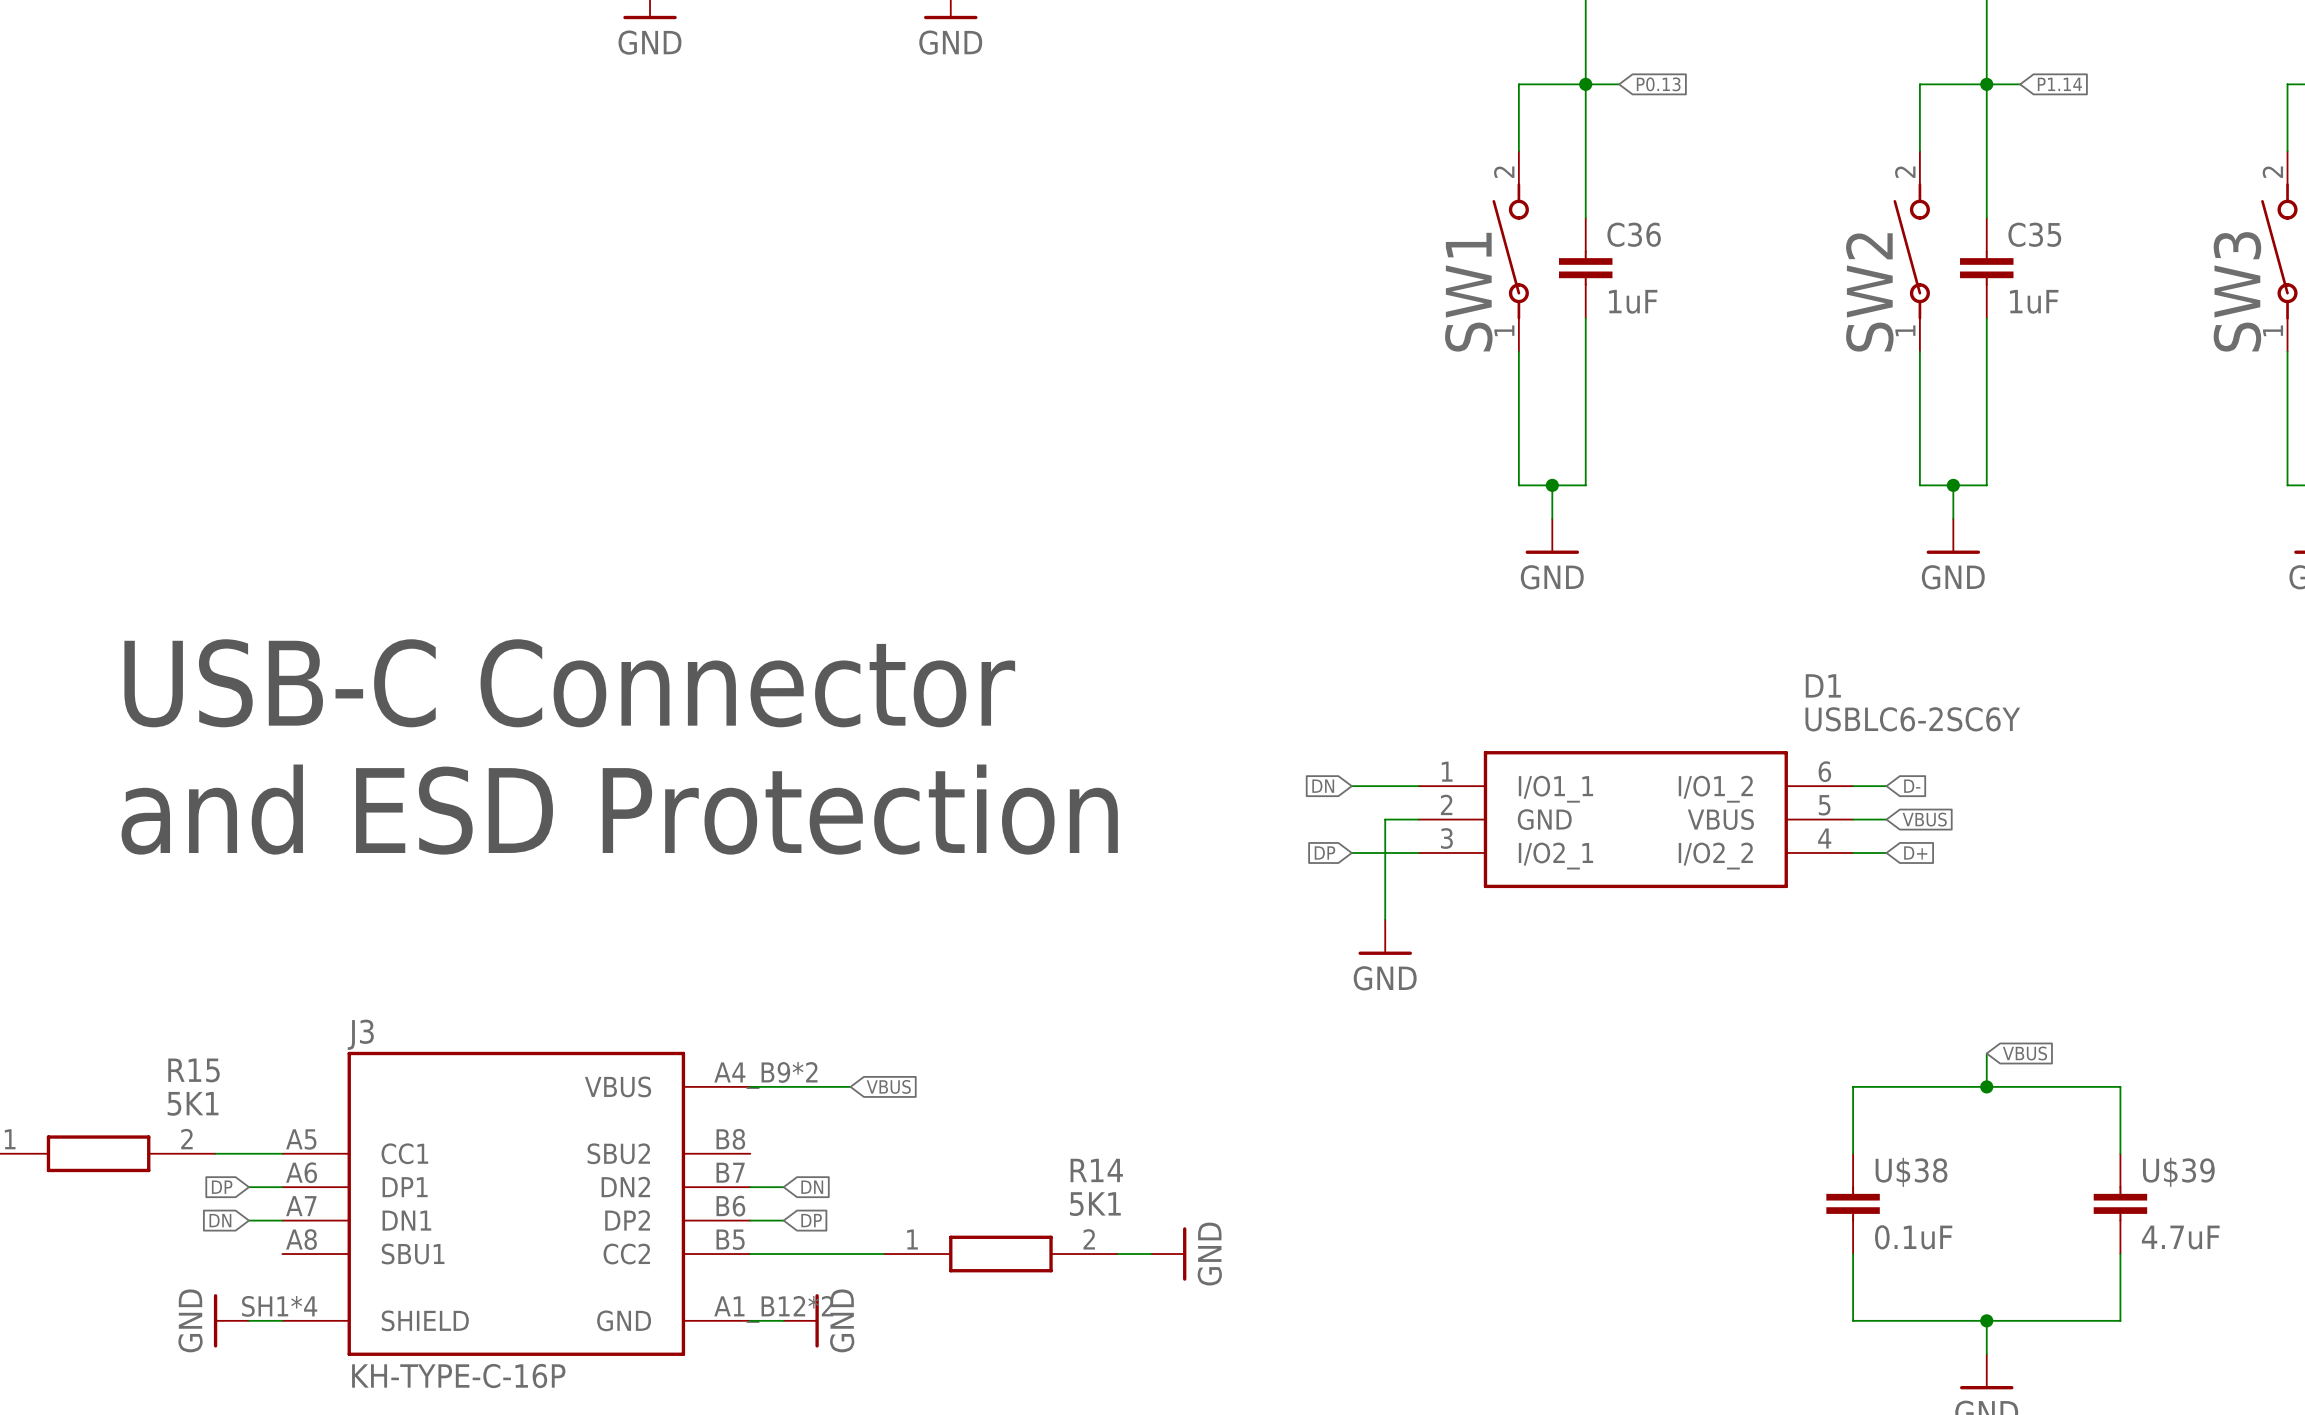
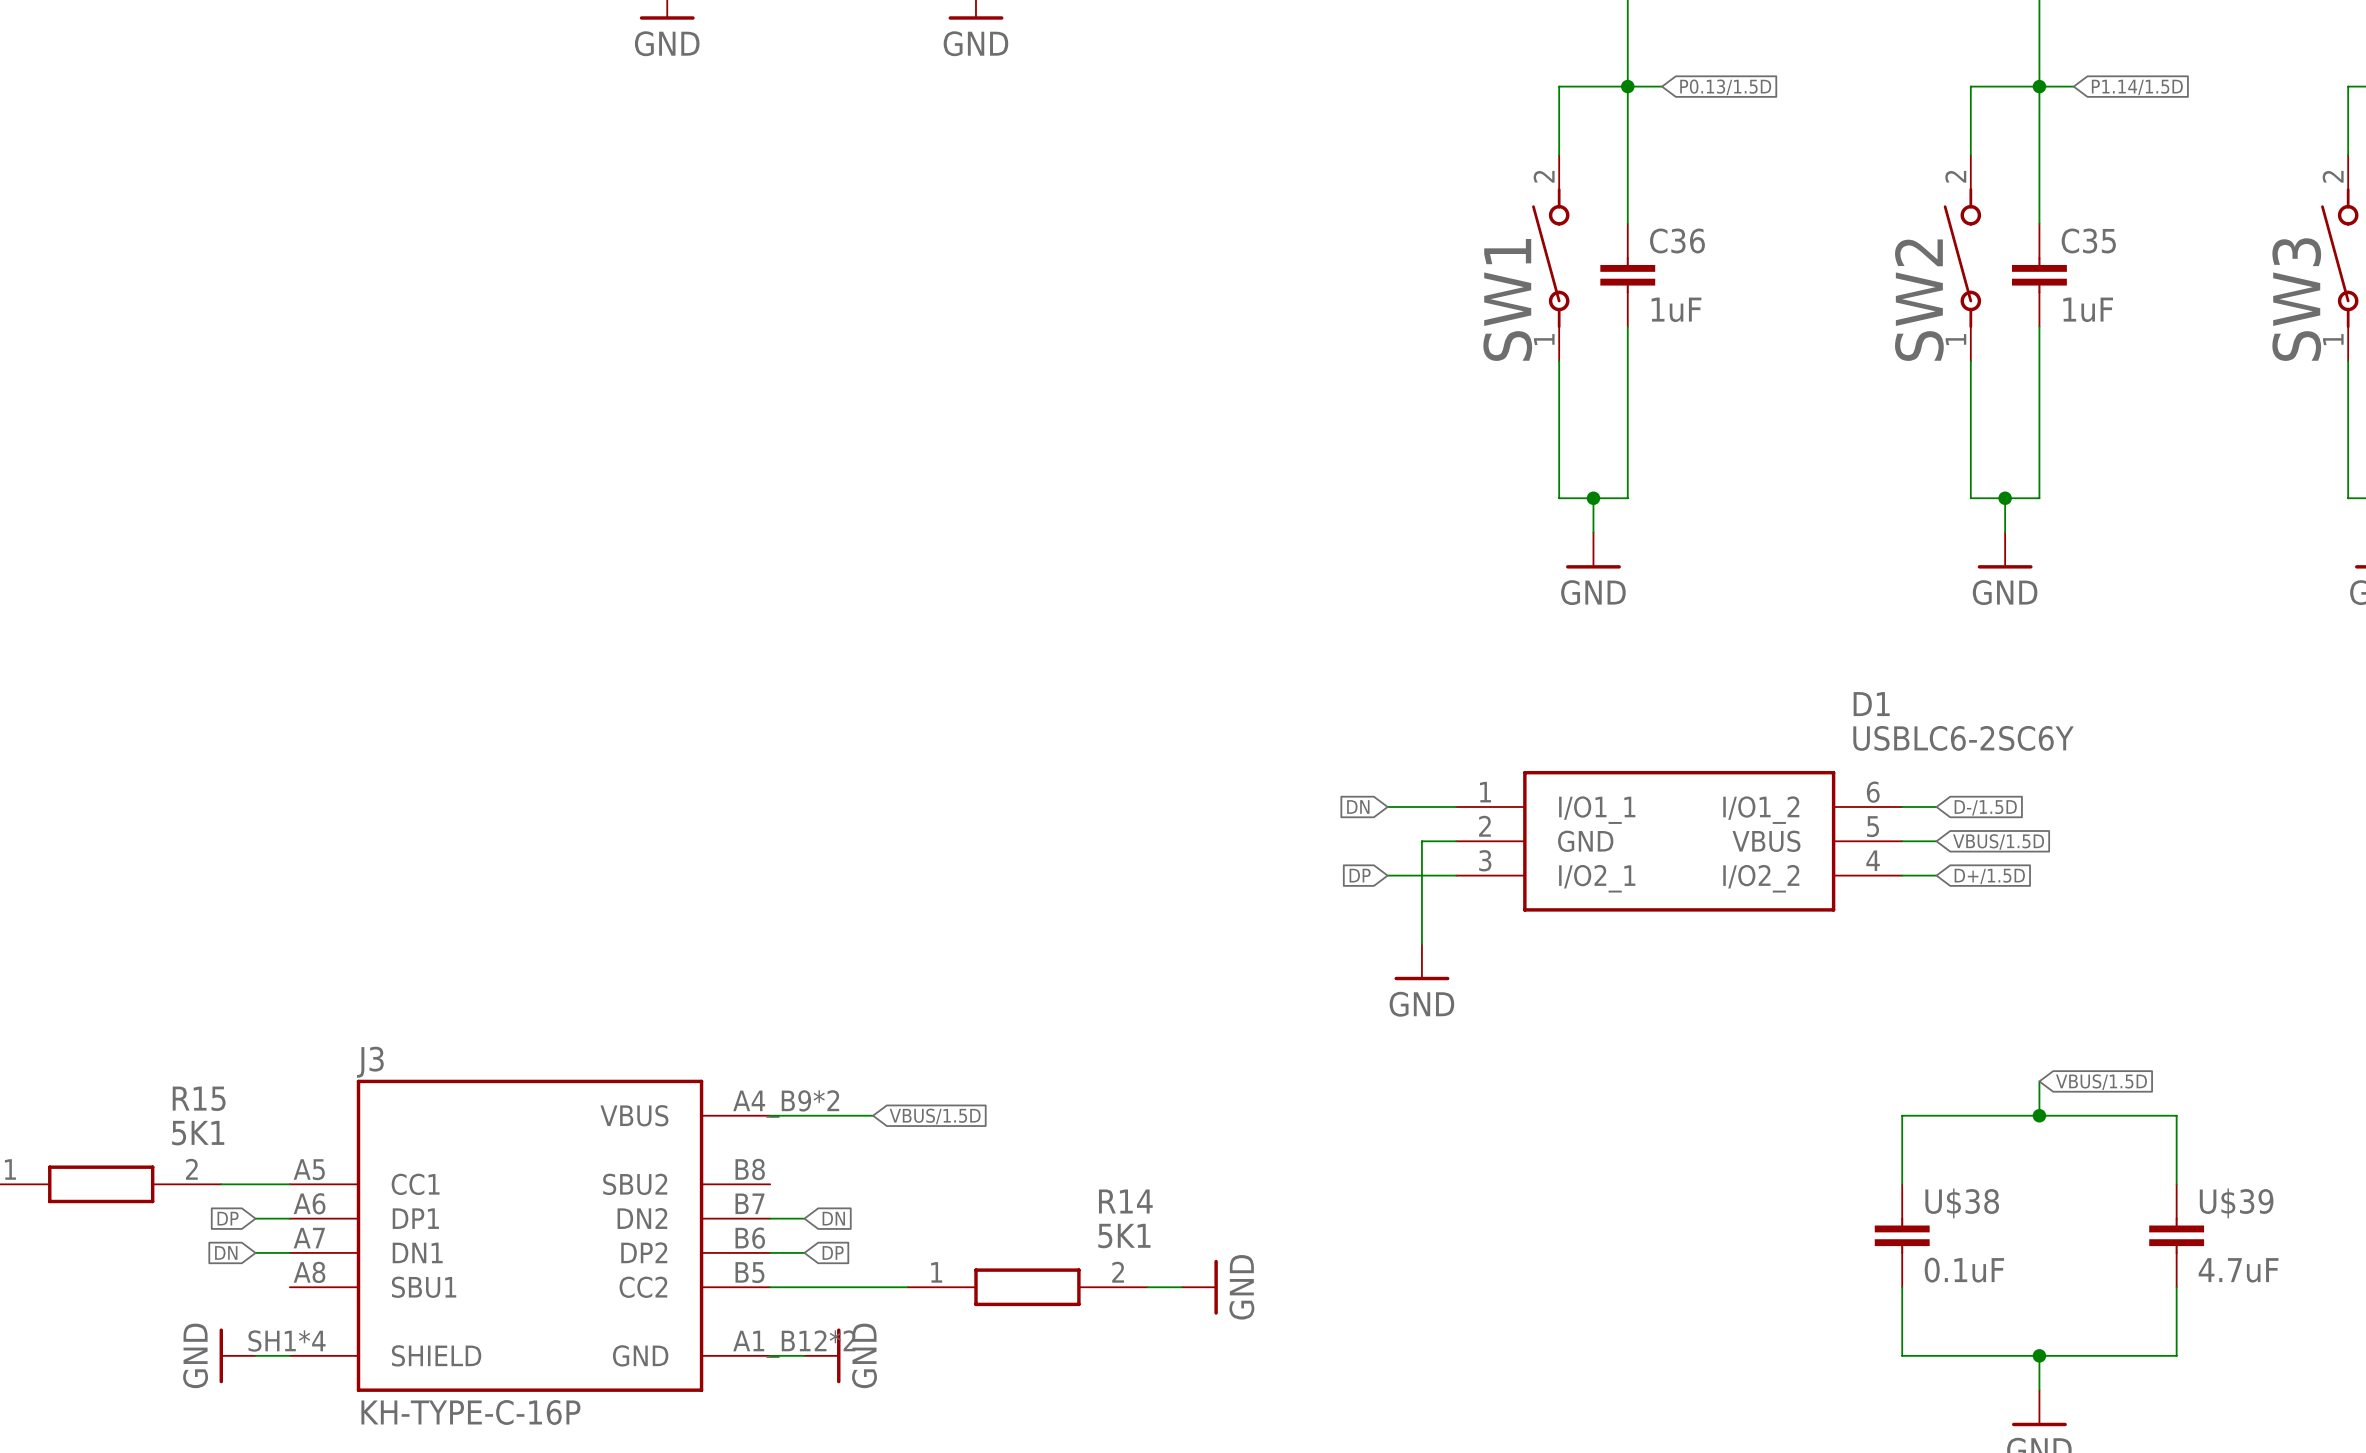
global label: P0.13 (1658, 84) -> P0.13/1.5D (1725, 87)
global label: P1.14 (2059, 84) -> P1.14/1.5D (2137, 87)
text: USB-C Connector (569, 683) -> none
global label: D- (1912, 786) -> D-/1.5D (1985, 807)
text: and ESD Protection (619, 809) -> none
global label: VBUS (1924, 819) -> VBUS/1.5D (1998, 842)
global label: D+ (1915, 852) -> D+/1.5D (1989, 876)
global label: VBUS (2024, 1053) -> VBUS/1.5D (2101, 1082)
global label: VBUS (888, 1086) -> VBUS/1.5D (935, 1116)

